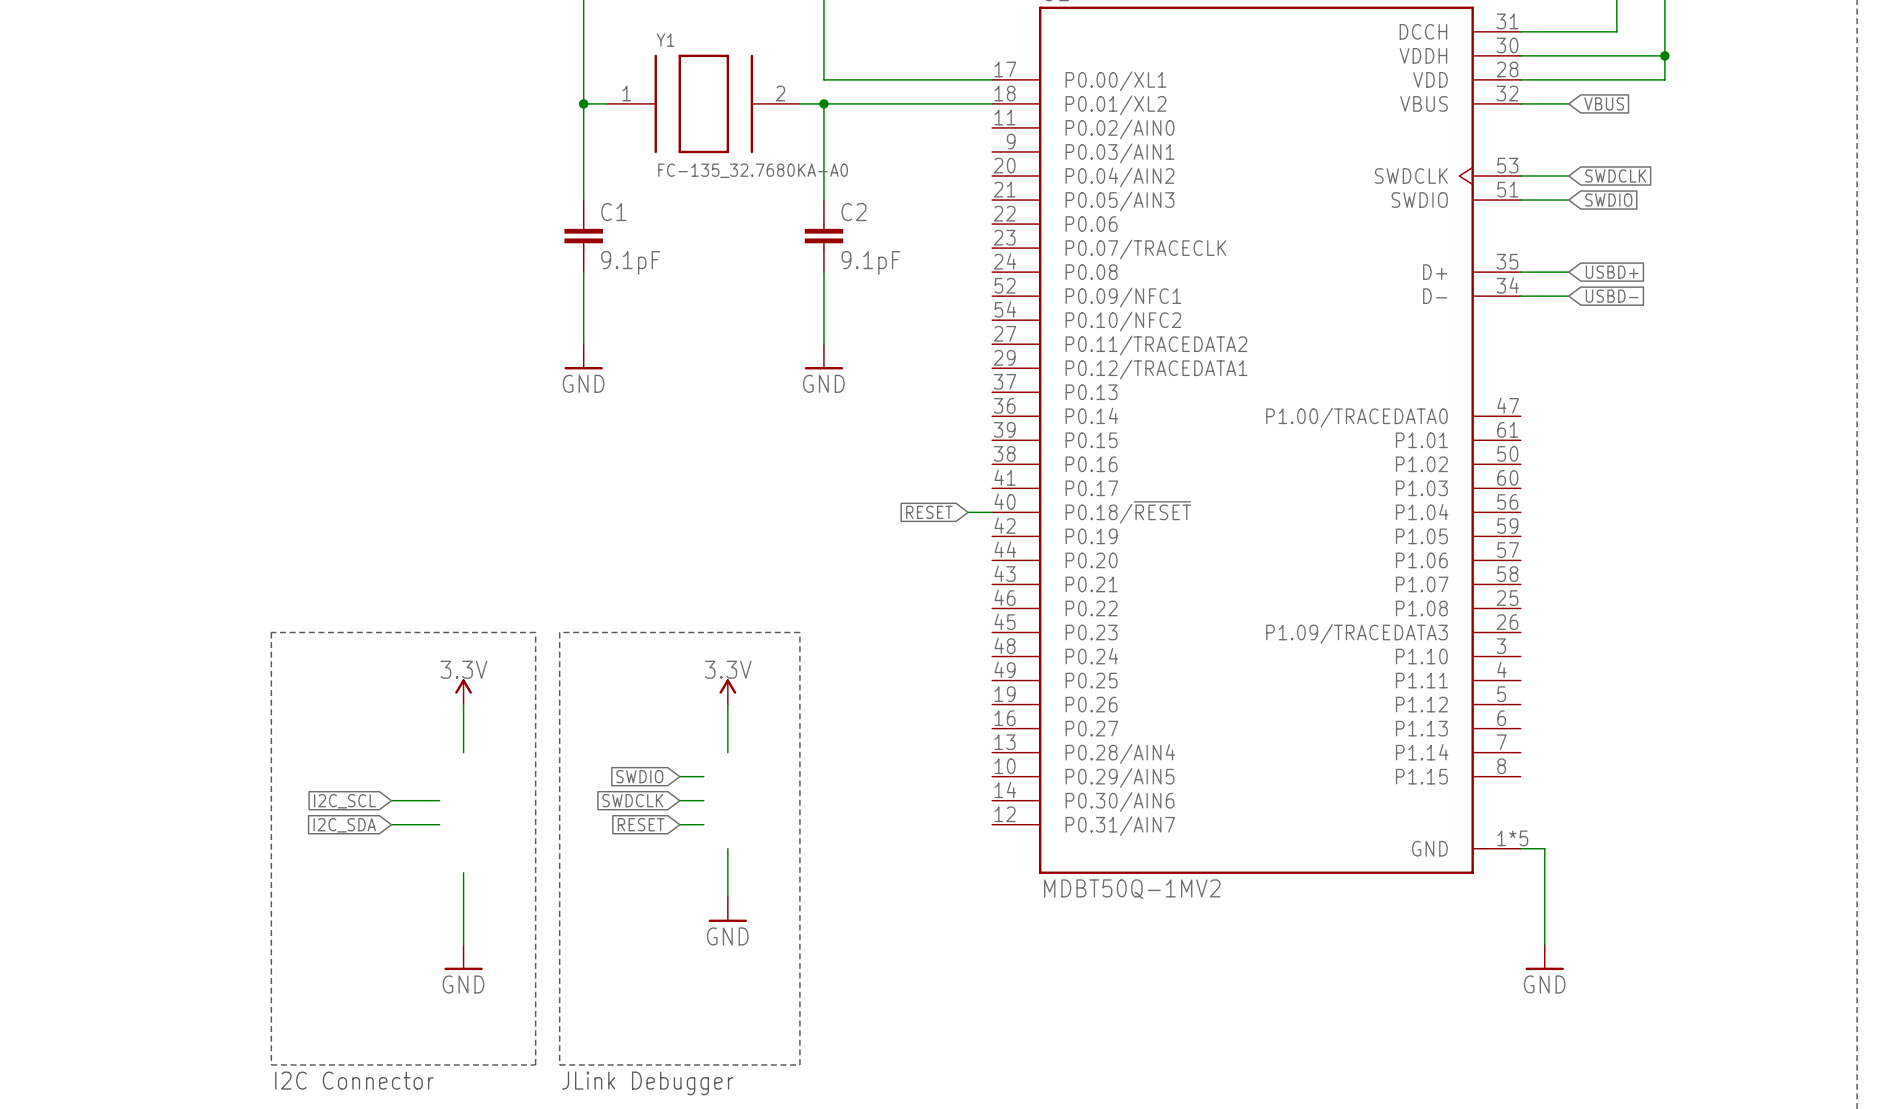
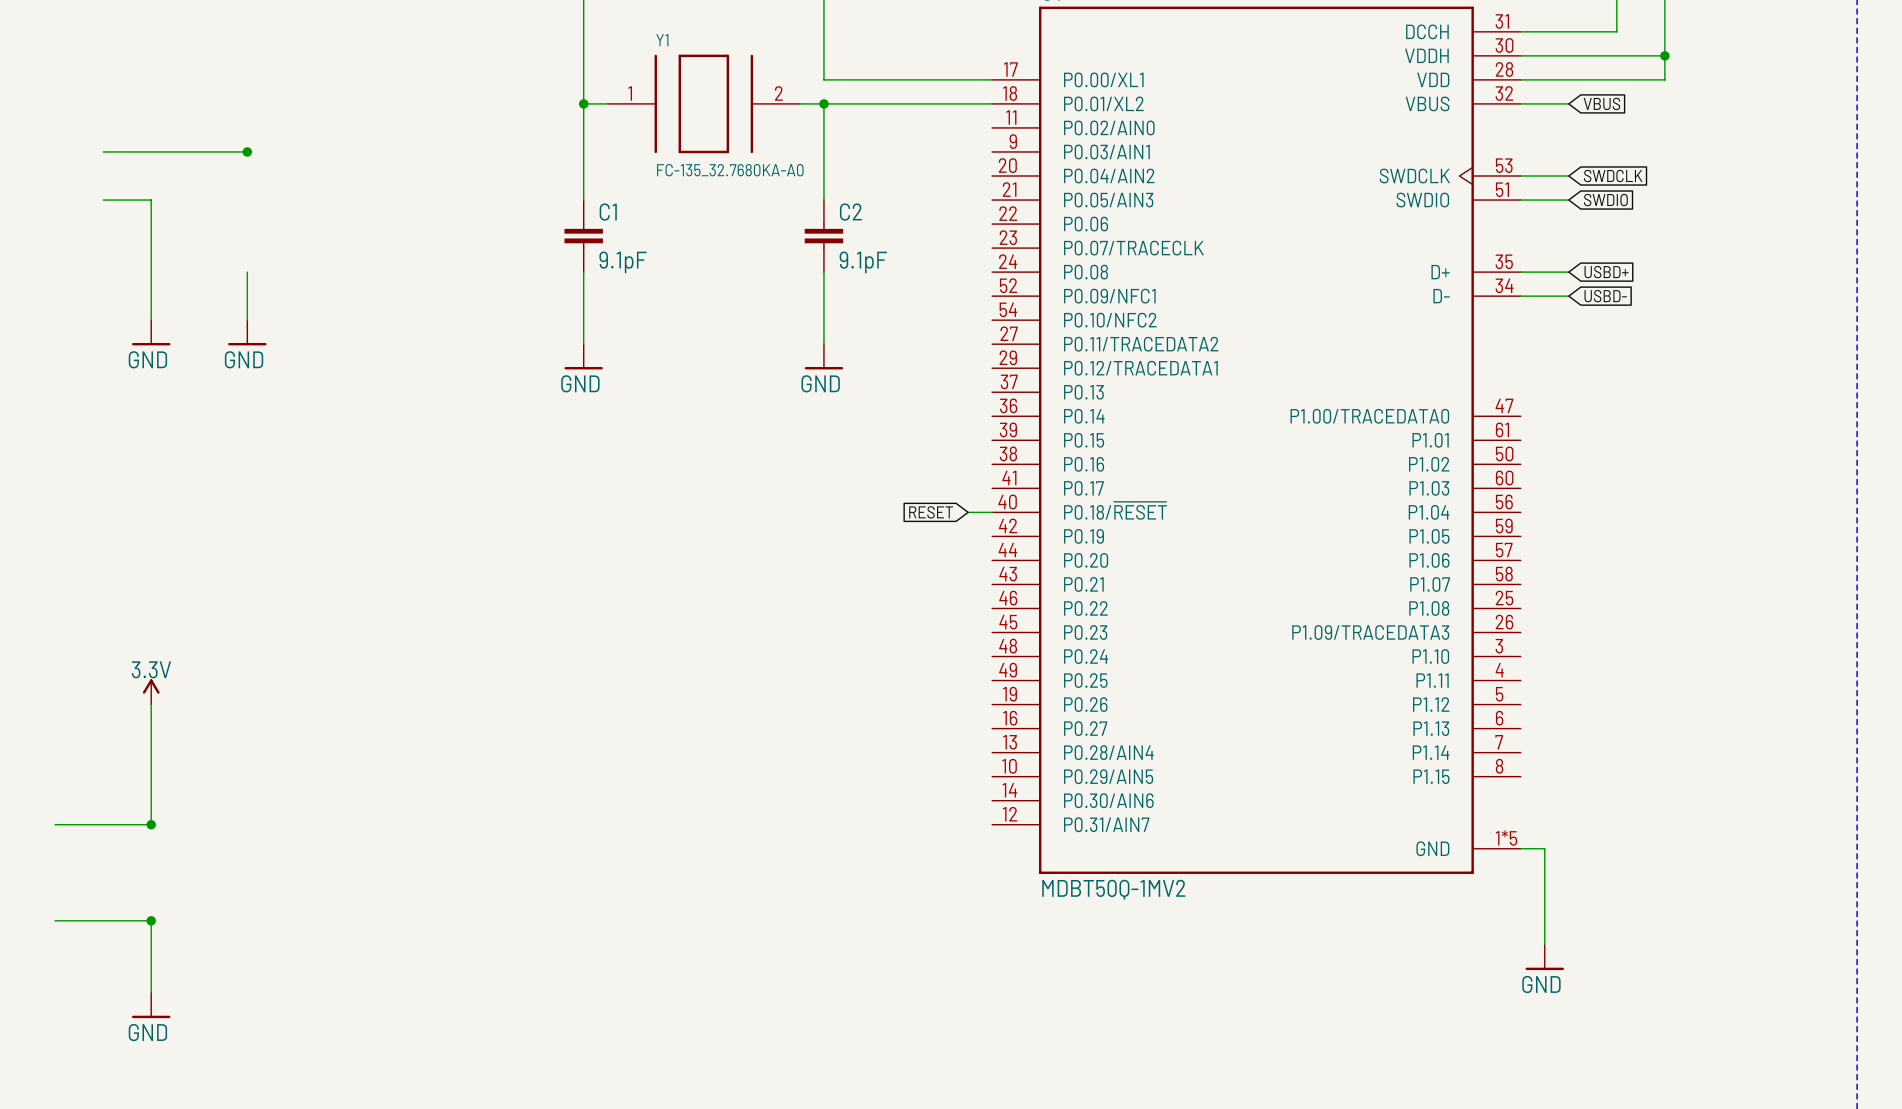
wire: none -> (103, 151) (247, 151)
junction: none -> (247, 151)
wire: none -> (103, 200) (151, 200) (151, 320)
wire: none -> (247, 272) (247, 320)
power symbol: none -> GND (151, 332)
power symbol: none -> GND (247, 332)
line: (271, 632) (535, 632) (535, 1064) (271, 1064) (271, 632) -> none
line: (559, 632) (559, 1064) (799, 1064) (799, 632) (559, 632) -> none
power symbol: none -> 3.3V (151, 691)
power symbol: 3.3V (463, 691) -> none
power symbol: 3.3V (727, 691) -> none
wire: none -> (151, 704) (151, 824) (55, 824)
wire: (463, 704) (463, 752) -> none
wire: (727, 704) (727, 752) -> none
global label: SWDIO (639, 776) -> none
wire: (679, 776) (703, 776) -> none
wire: (391, 800) (439, 800) -> none
global label: SWDCLK (632, 800) -> none
wire: (679, 800) (703, 800) -> none
global label: I2C_SCL (345, 801) -> none
junction: none -> (151, 824)
wire: (391, 824) (439, 824) -> none
global label: RESET (641, 824) -> none
wire: (679, 824) (703, 824) -> none
global label: I2C_SDA (344, 825) -> none
wire: (727, 848) (727, 896) -> none
wire: (463, 872) (463, 944) -> none
power symbol: GND (727, 909) -> none
wire: none -> (55, 920) (151, 920) (151, 992)
junction: none -> (151, 920)
power symbol: GND (463, 957) -> none
power symbol: none -> GND (151, 1005)
text: I2C Connector (354, 1080) -> none
text: JLink Debugger (647, 1083) -> none

